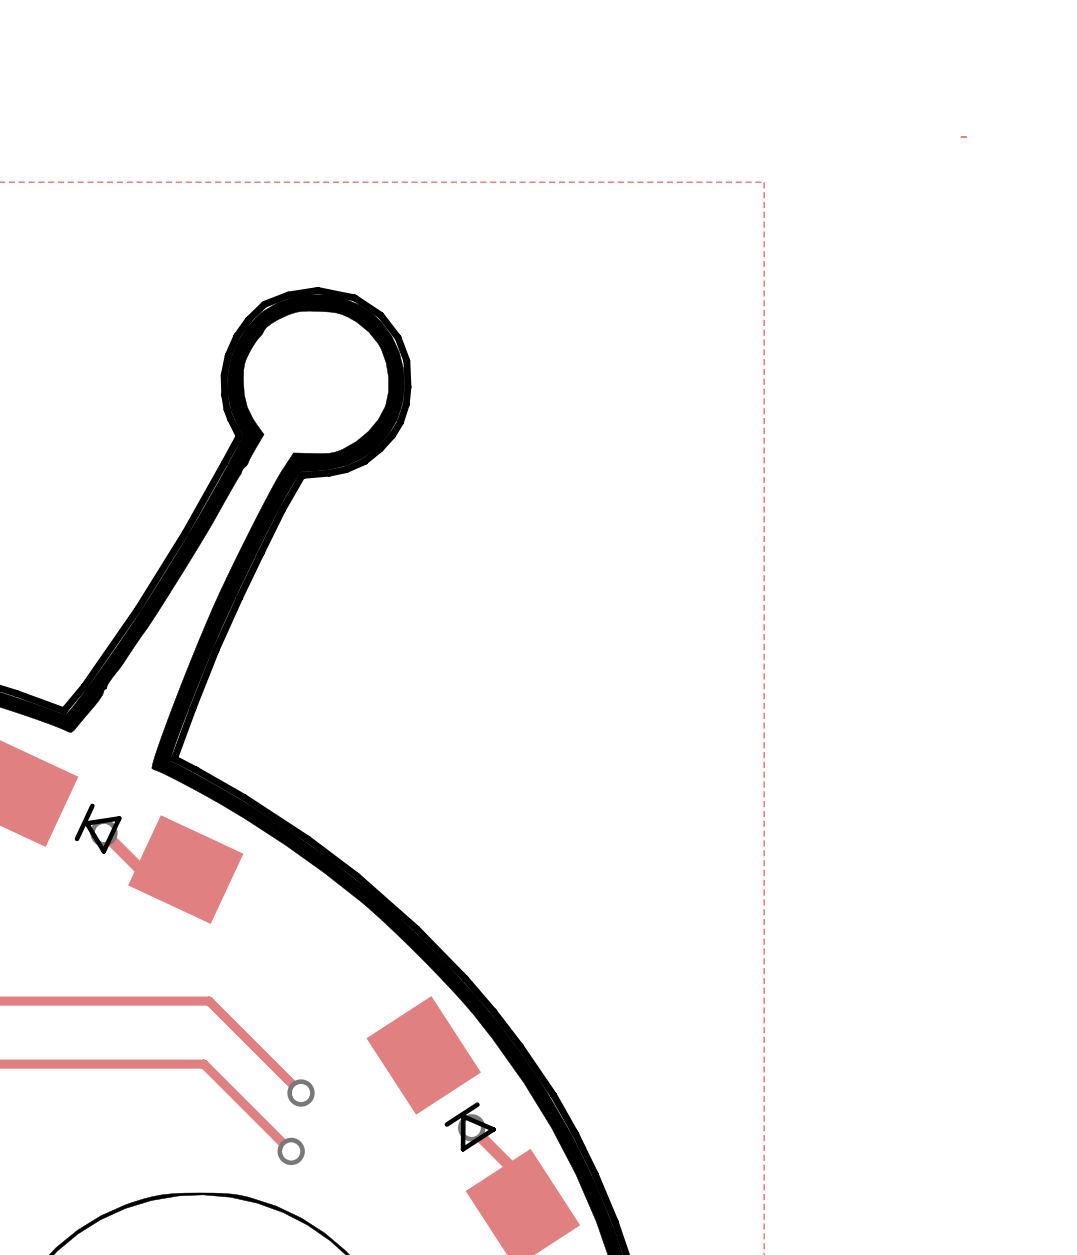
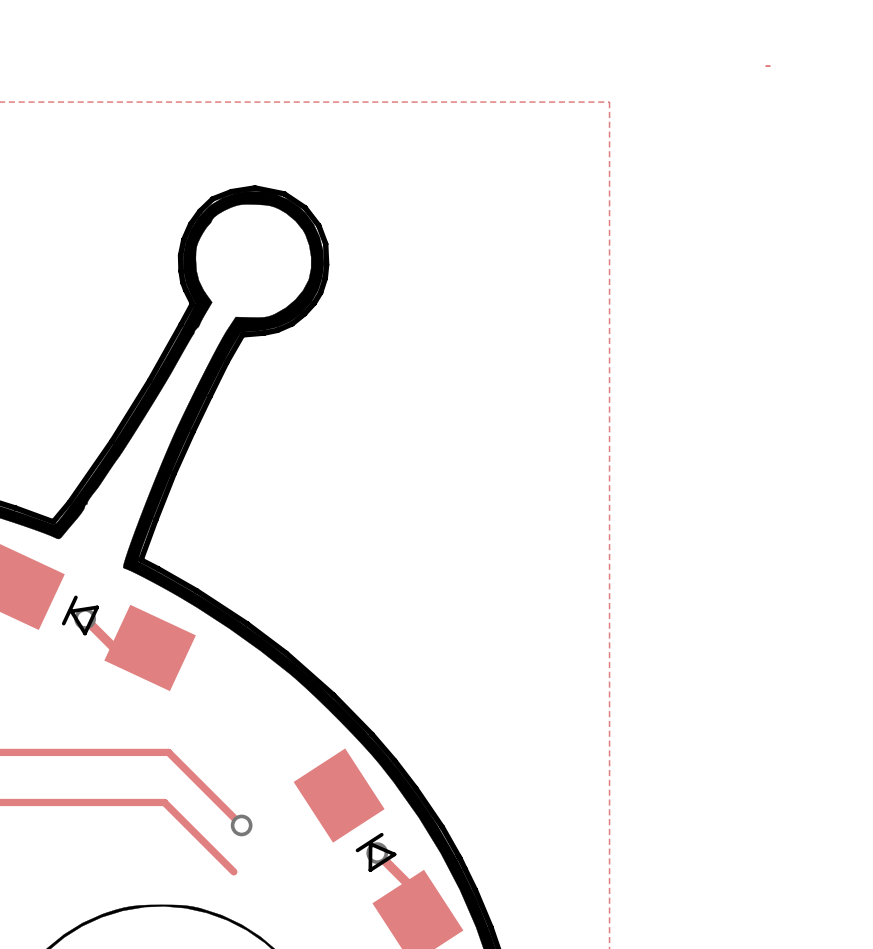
via: (291, 1151) -> none

